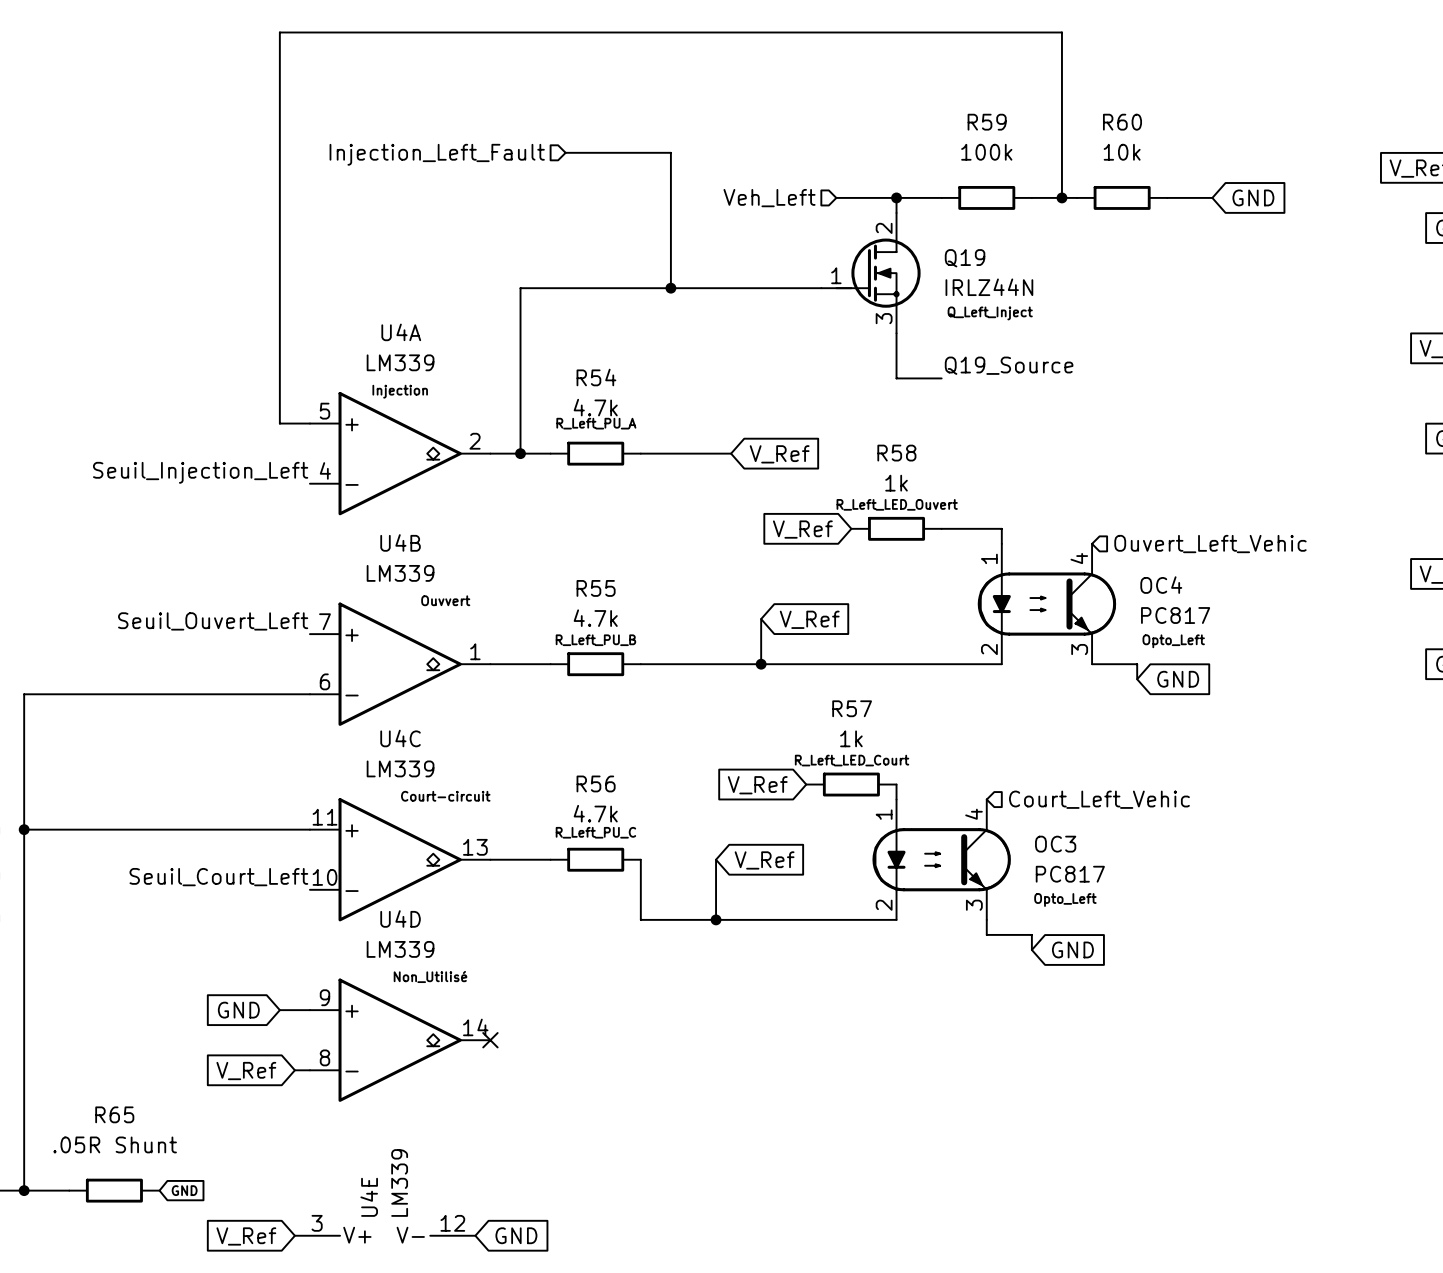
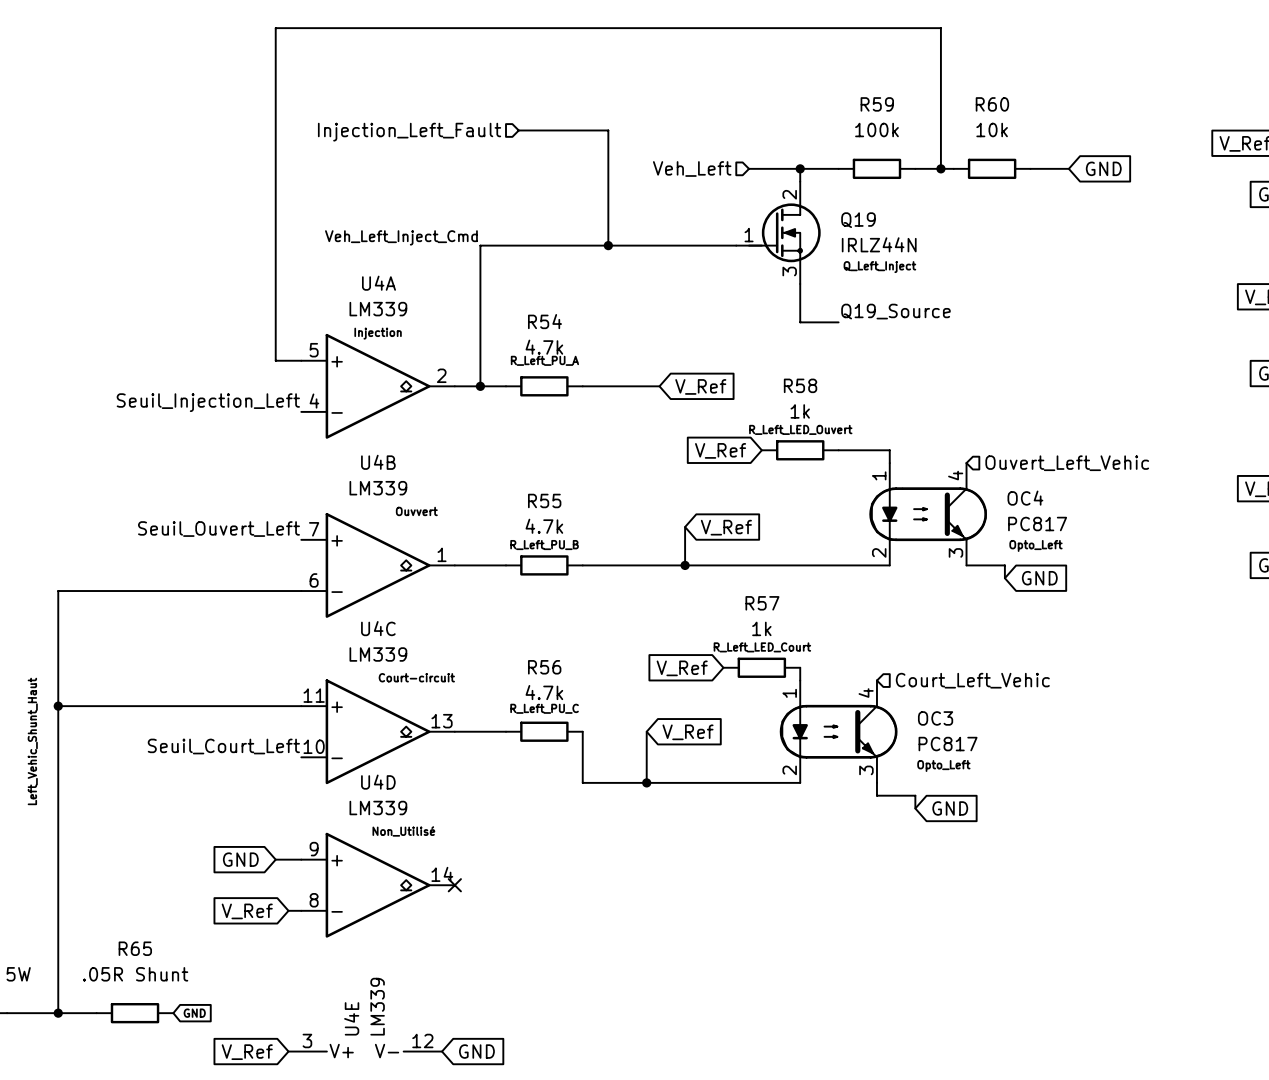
label: none -> Veh_Left_Inject_Cmd (401, 237)

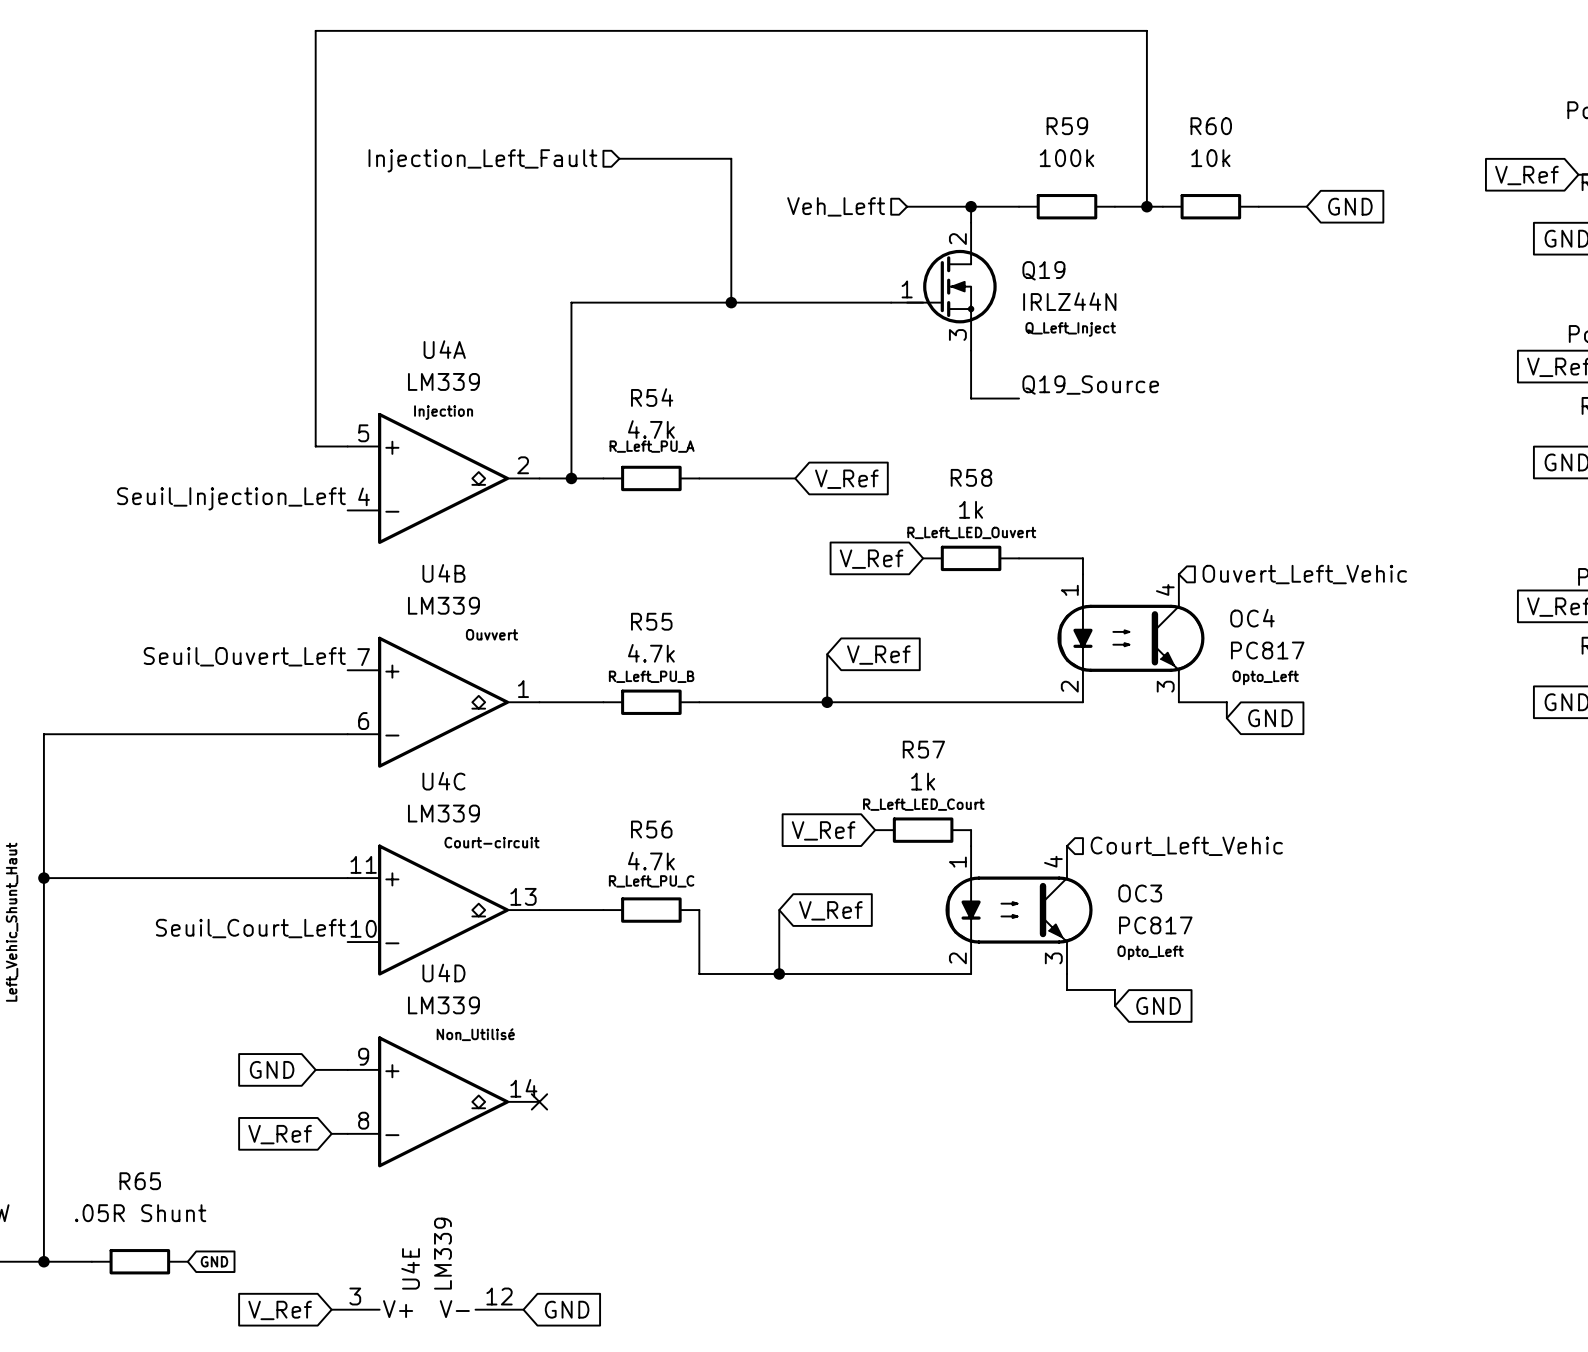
label: Veh_Left_Inject_Cmd (401, 237) -> none

